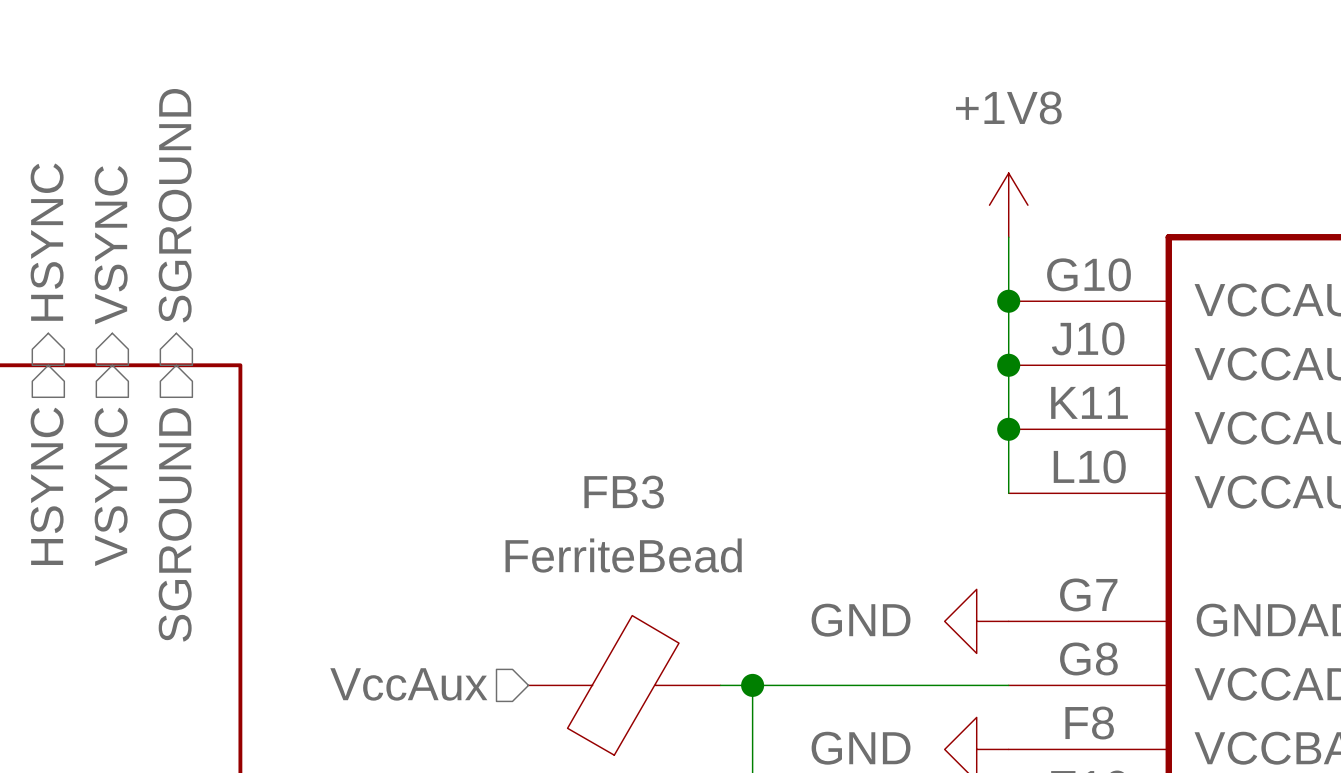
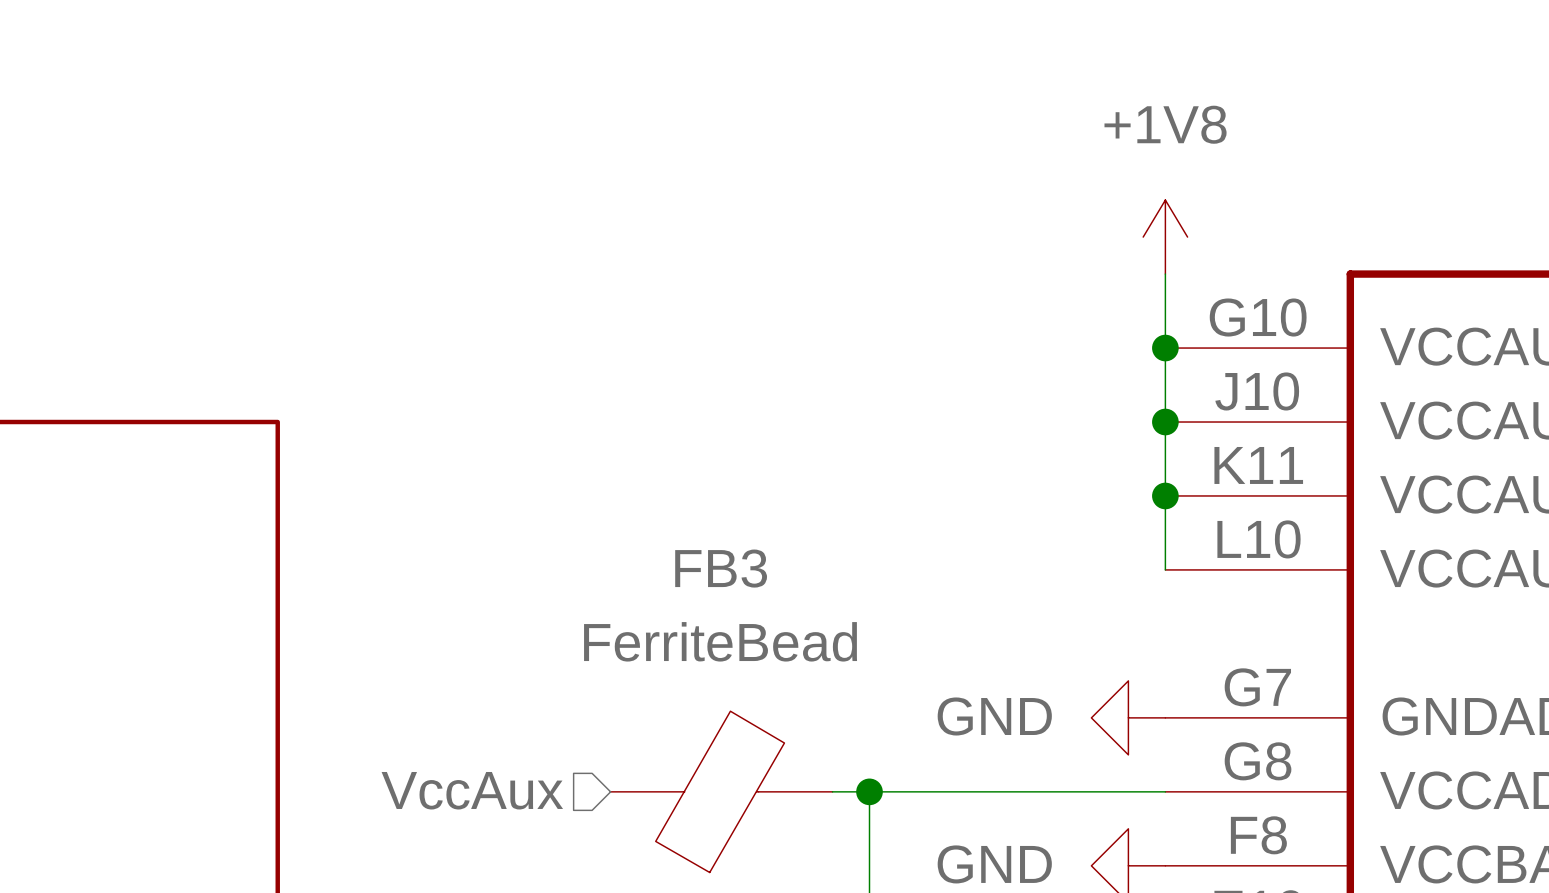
hierarchical label: SGROUND (175, 205) -> none
hierarchical label: HSYNC (47, 242) -> none
hierarchical label: VSYNC (111, 245) -> none
sheet pin: HSYNC (47, 486) -> none
sheet pin: VSYNC (111, 486) -> none
sheet pin: SGROUND (175, 524) -> none

